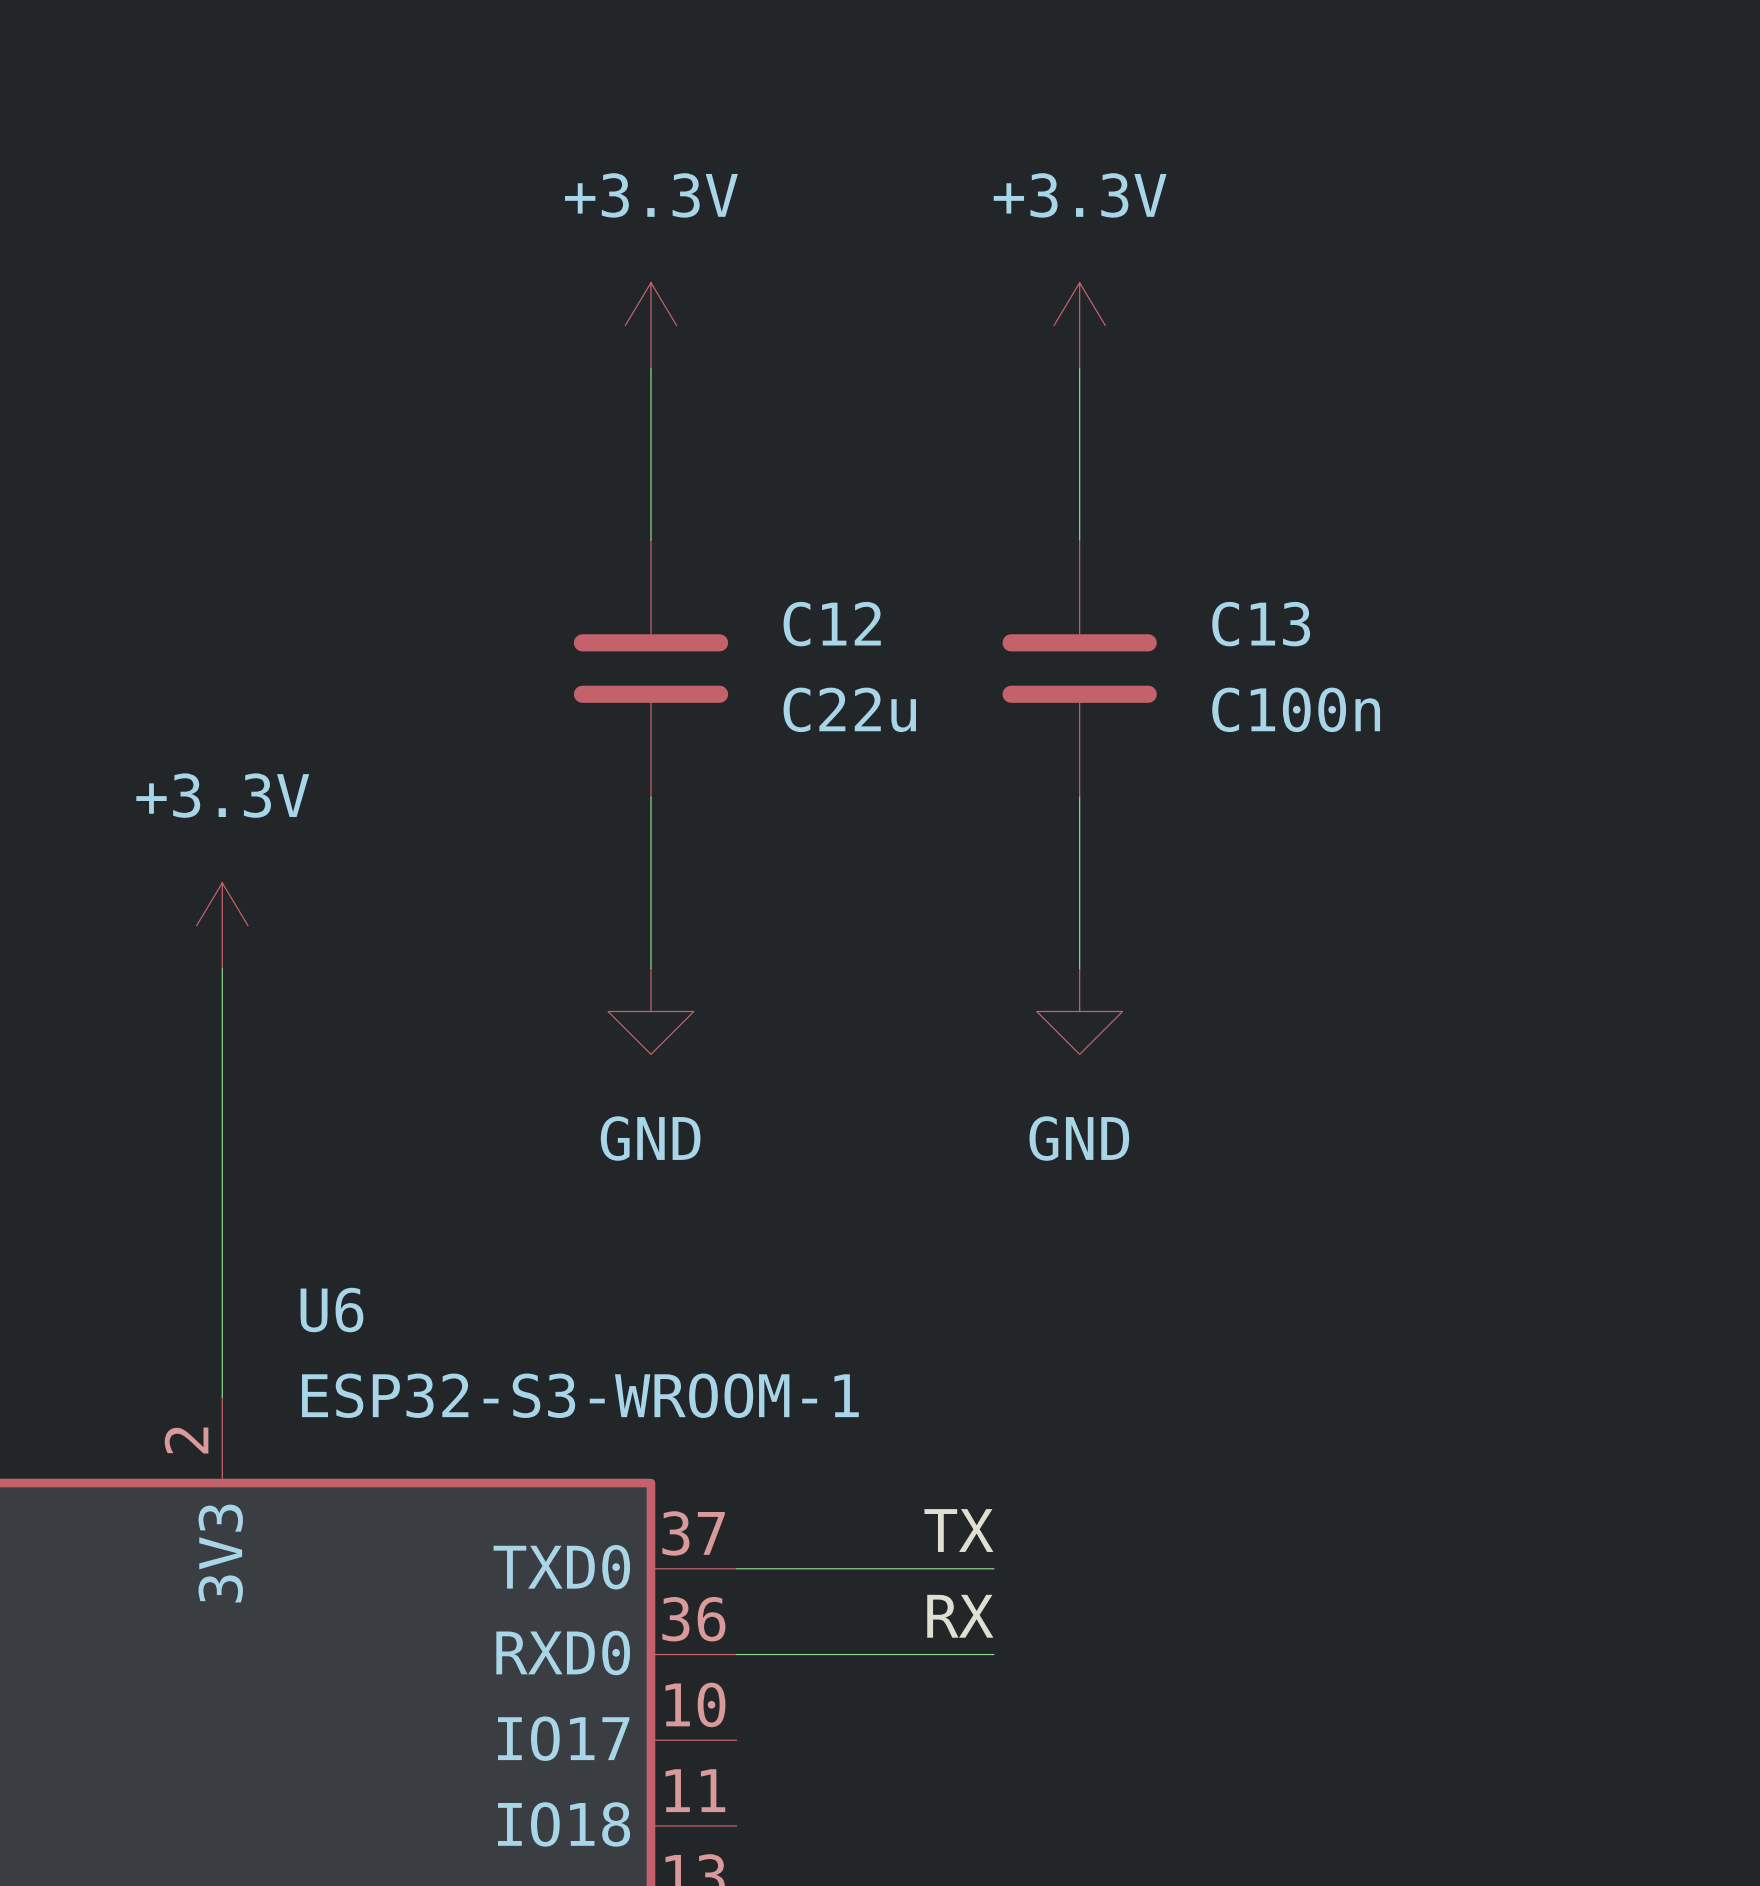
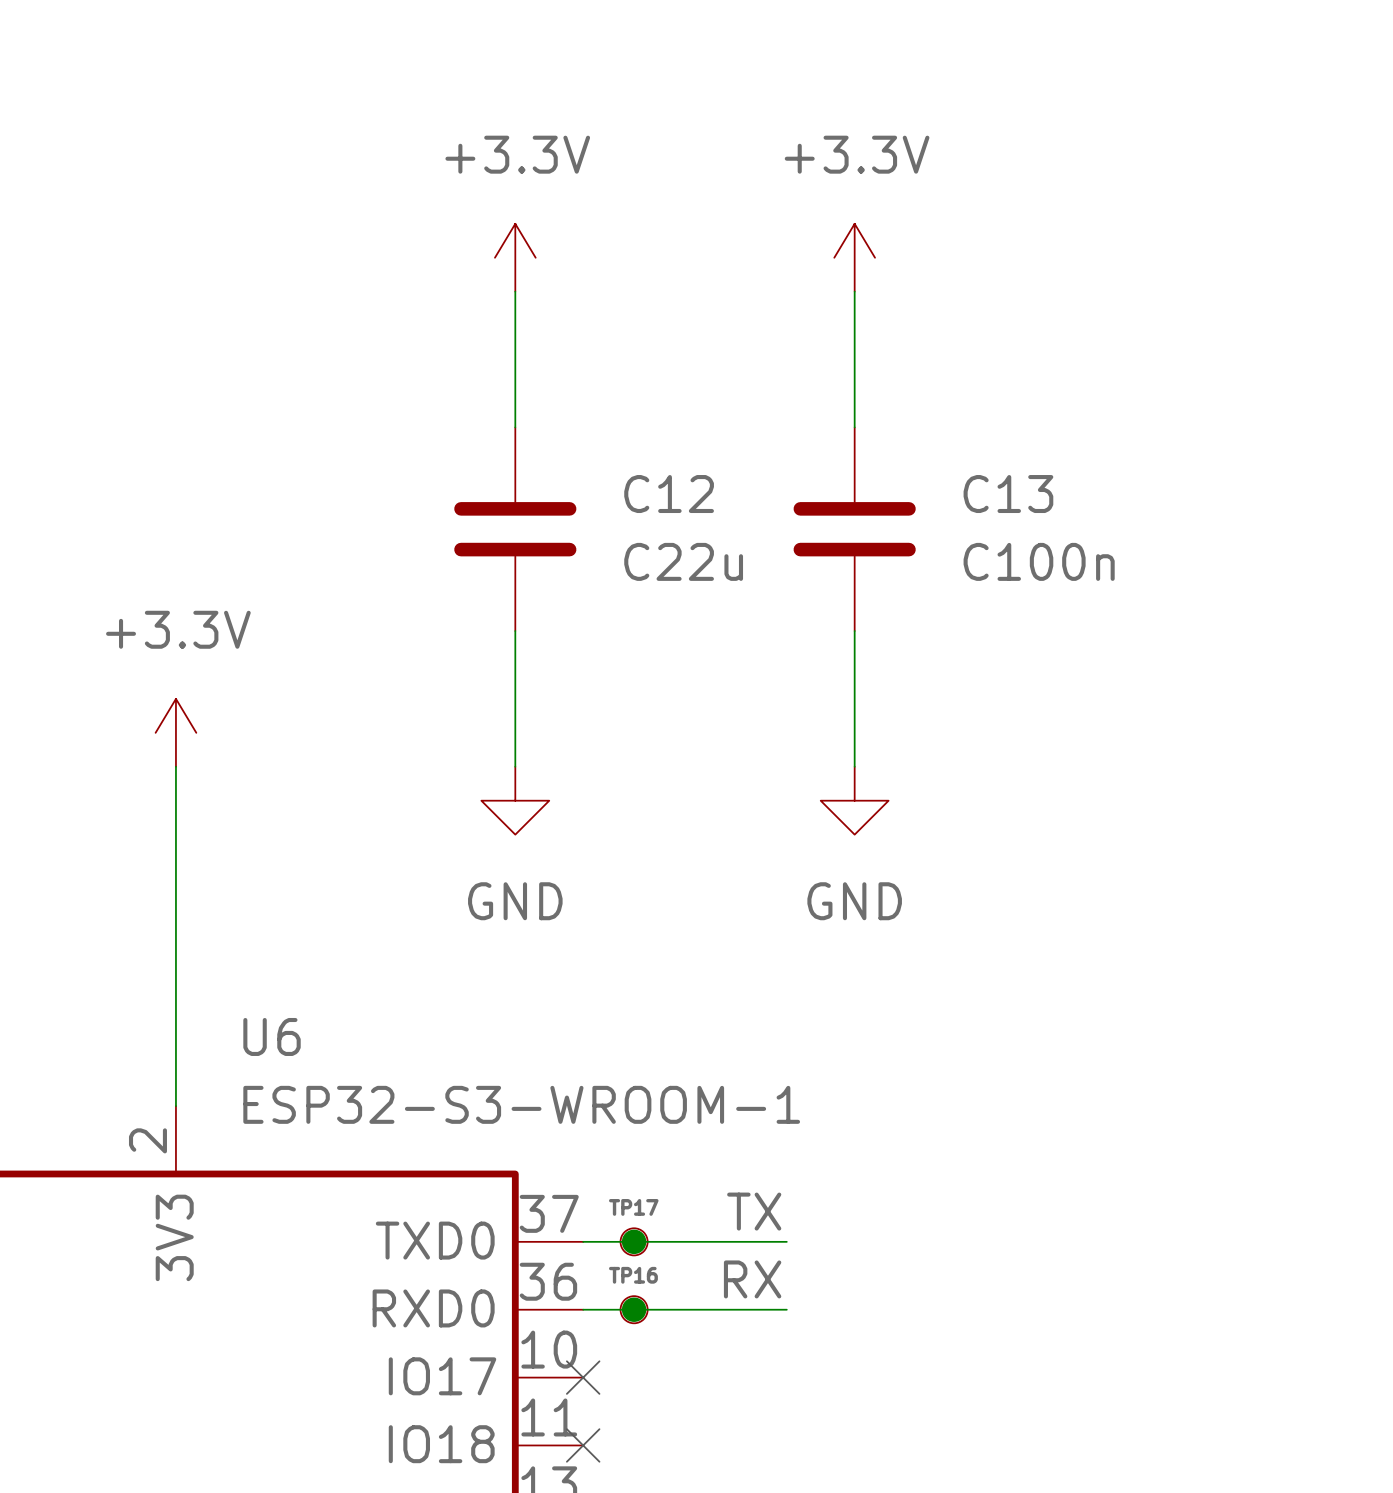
TP17: none -> (634, 1241)
junction: none -> (634, 1241)
TP16: none -> (634, 1309)
junction: none -> (634, 1309)
no-connect mark: none -> (583, 1377)
no-connect mark: none -> (583, 1445)

